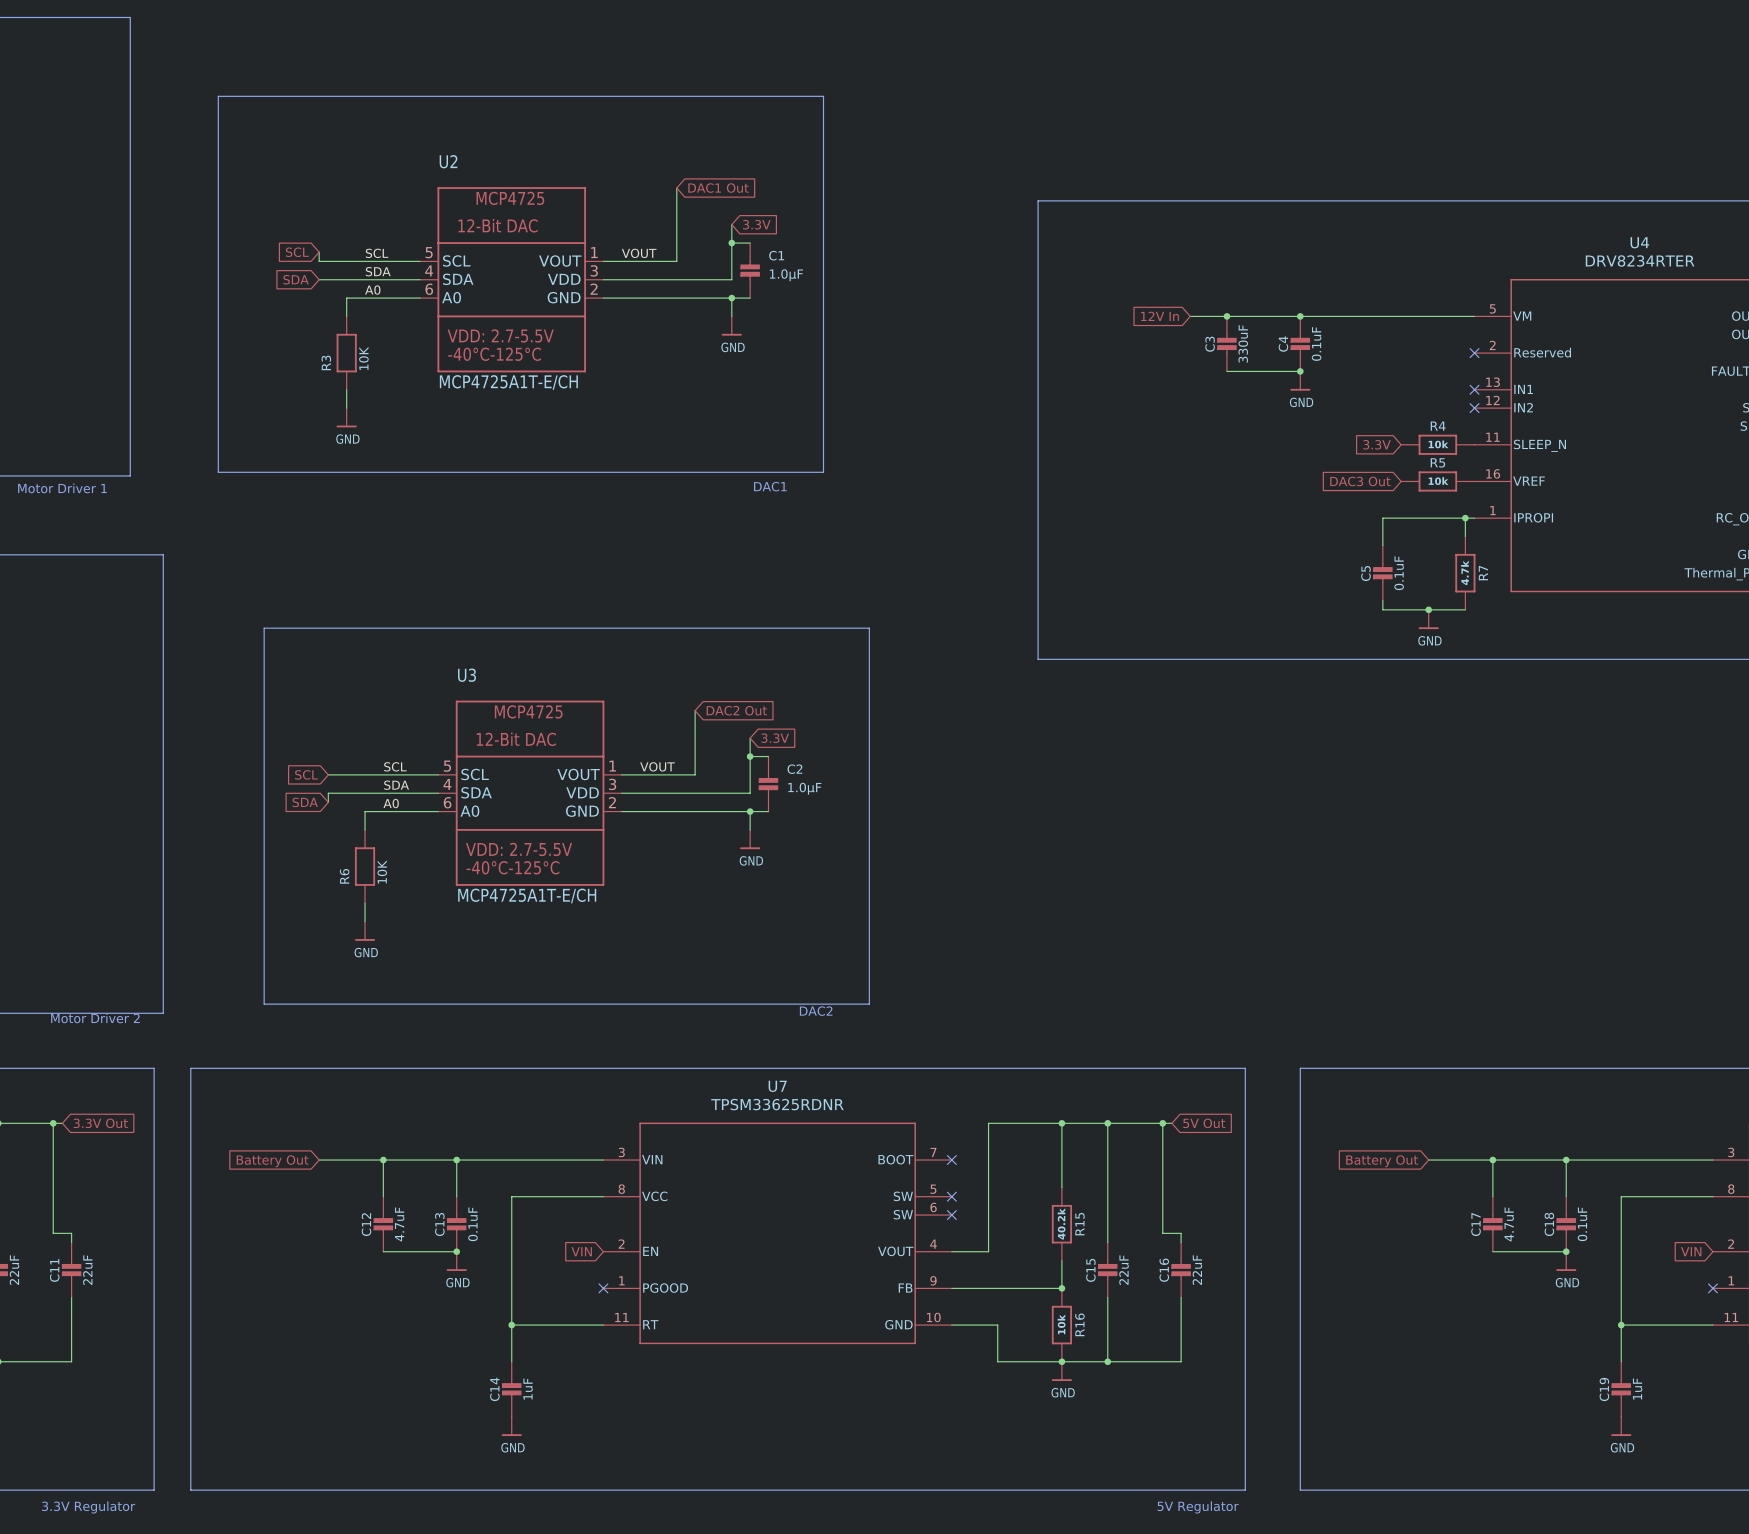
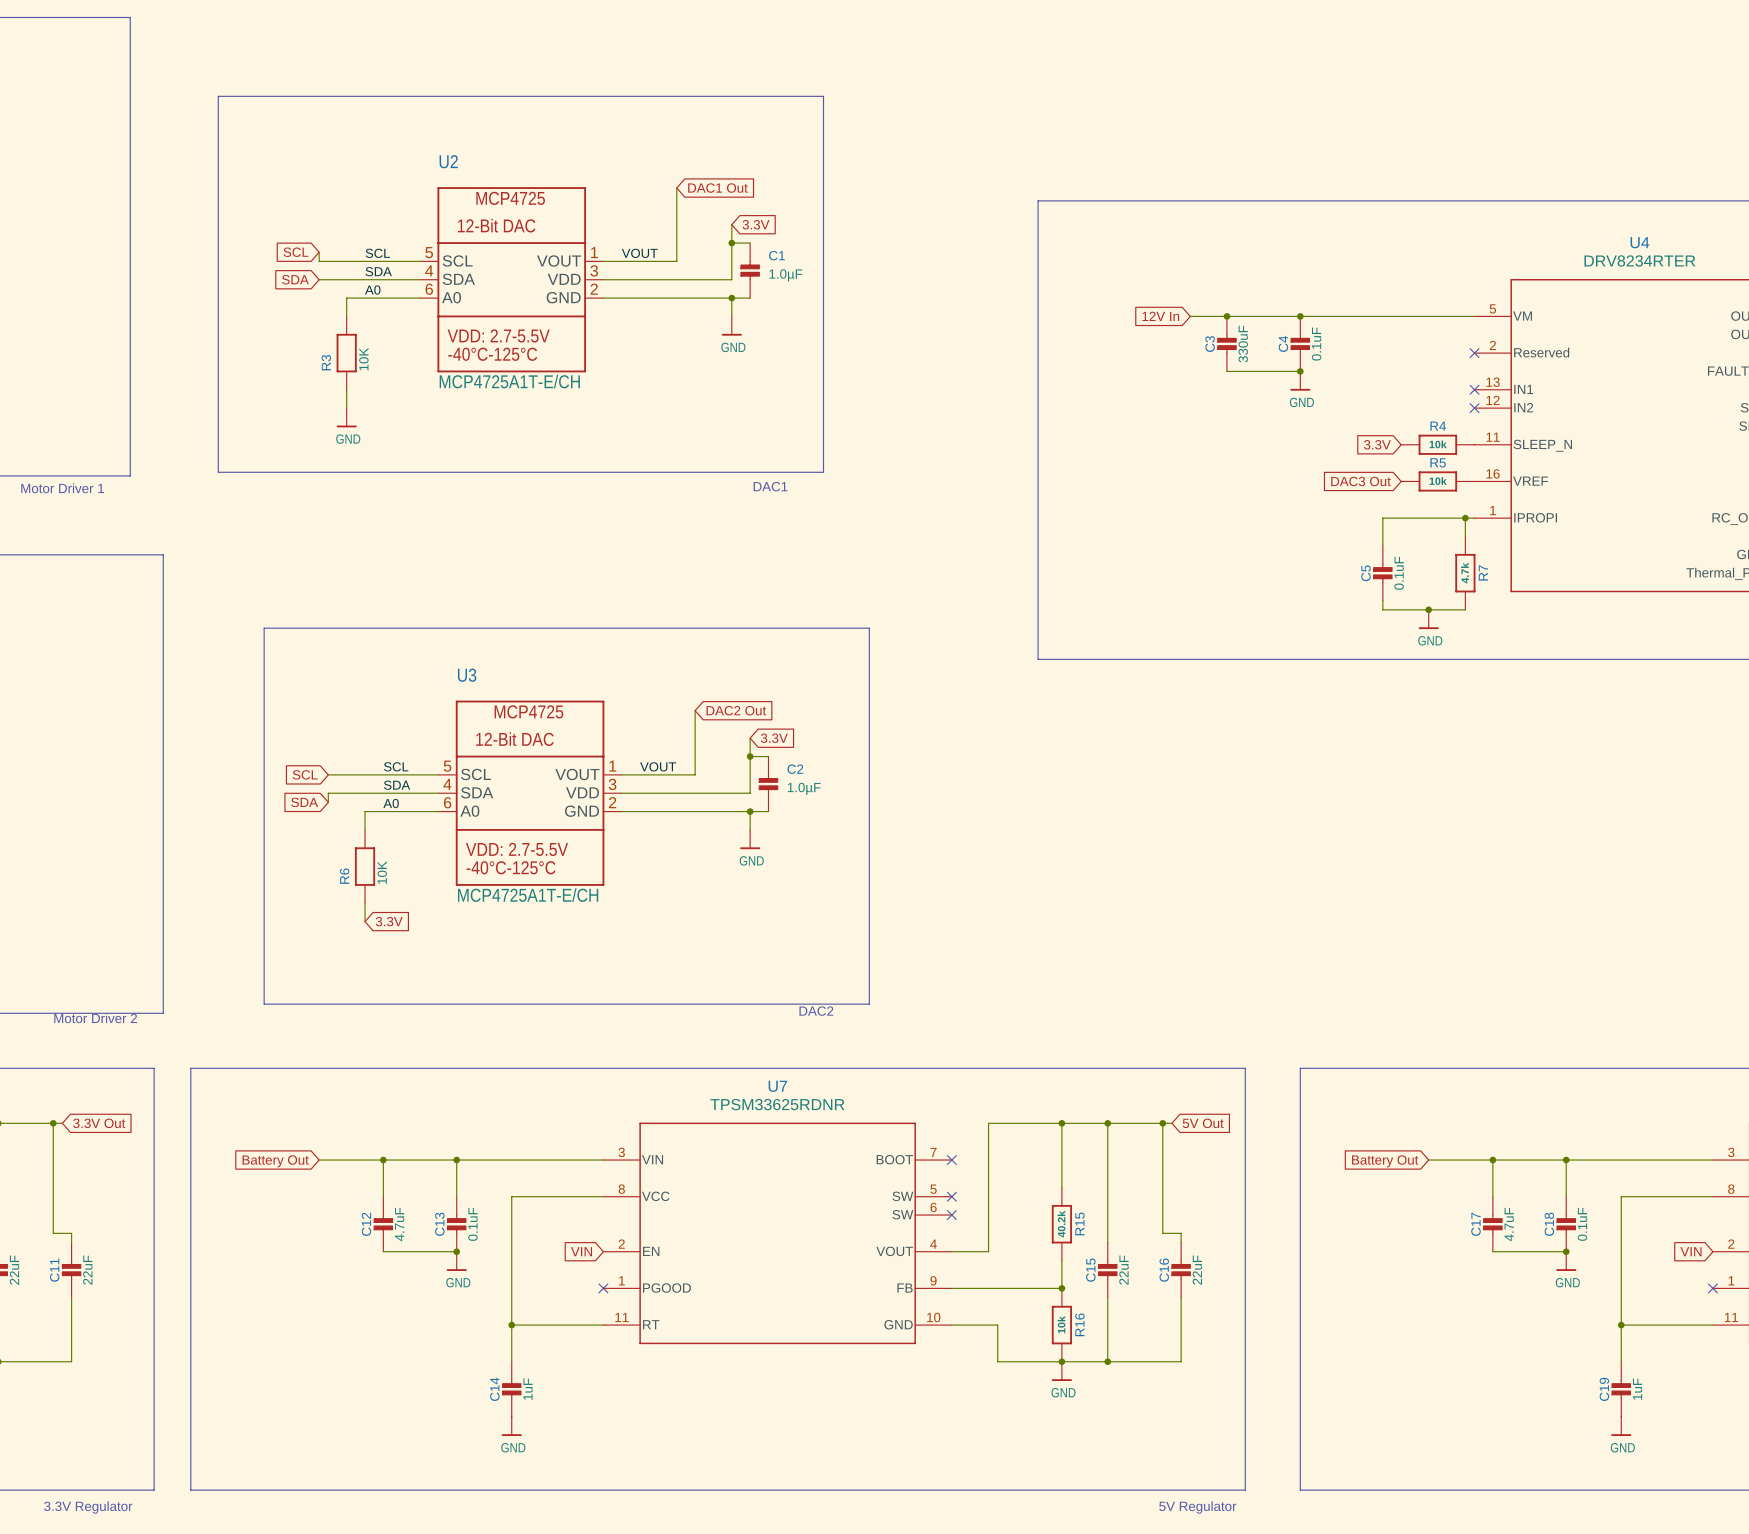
global label: none -> 3.3V (389, 921)
power symbol: GND (365, 931) -> none

